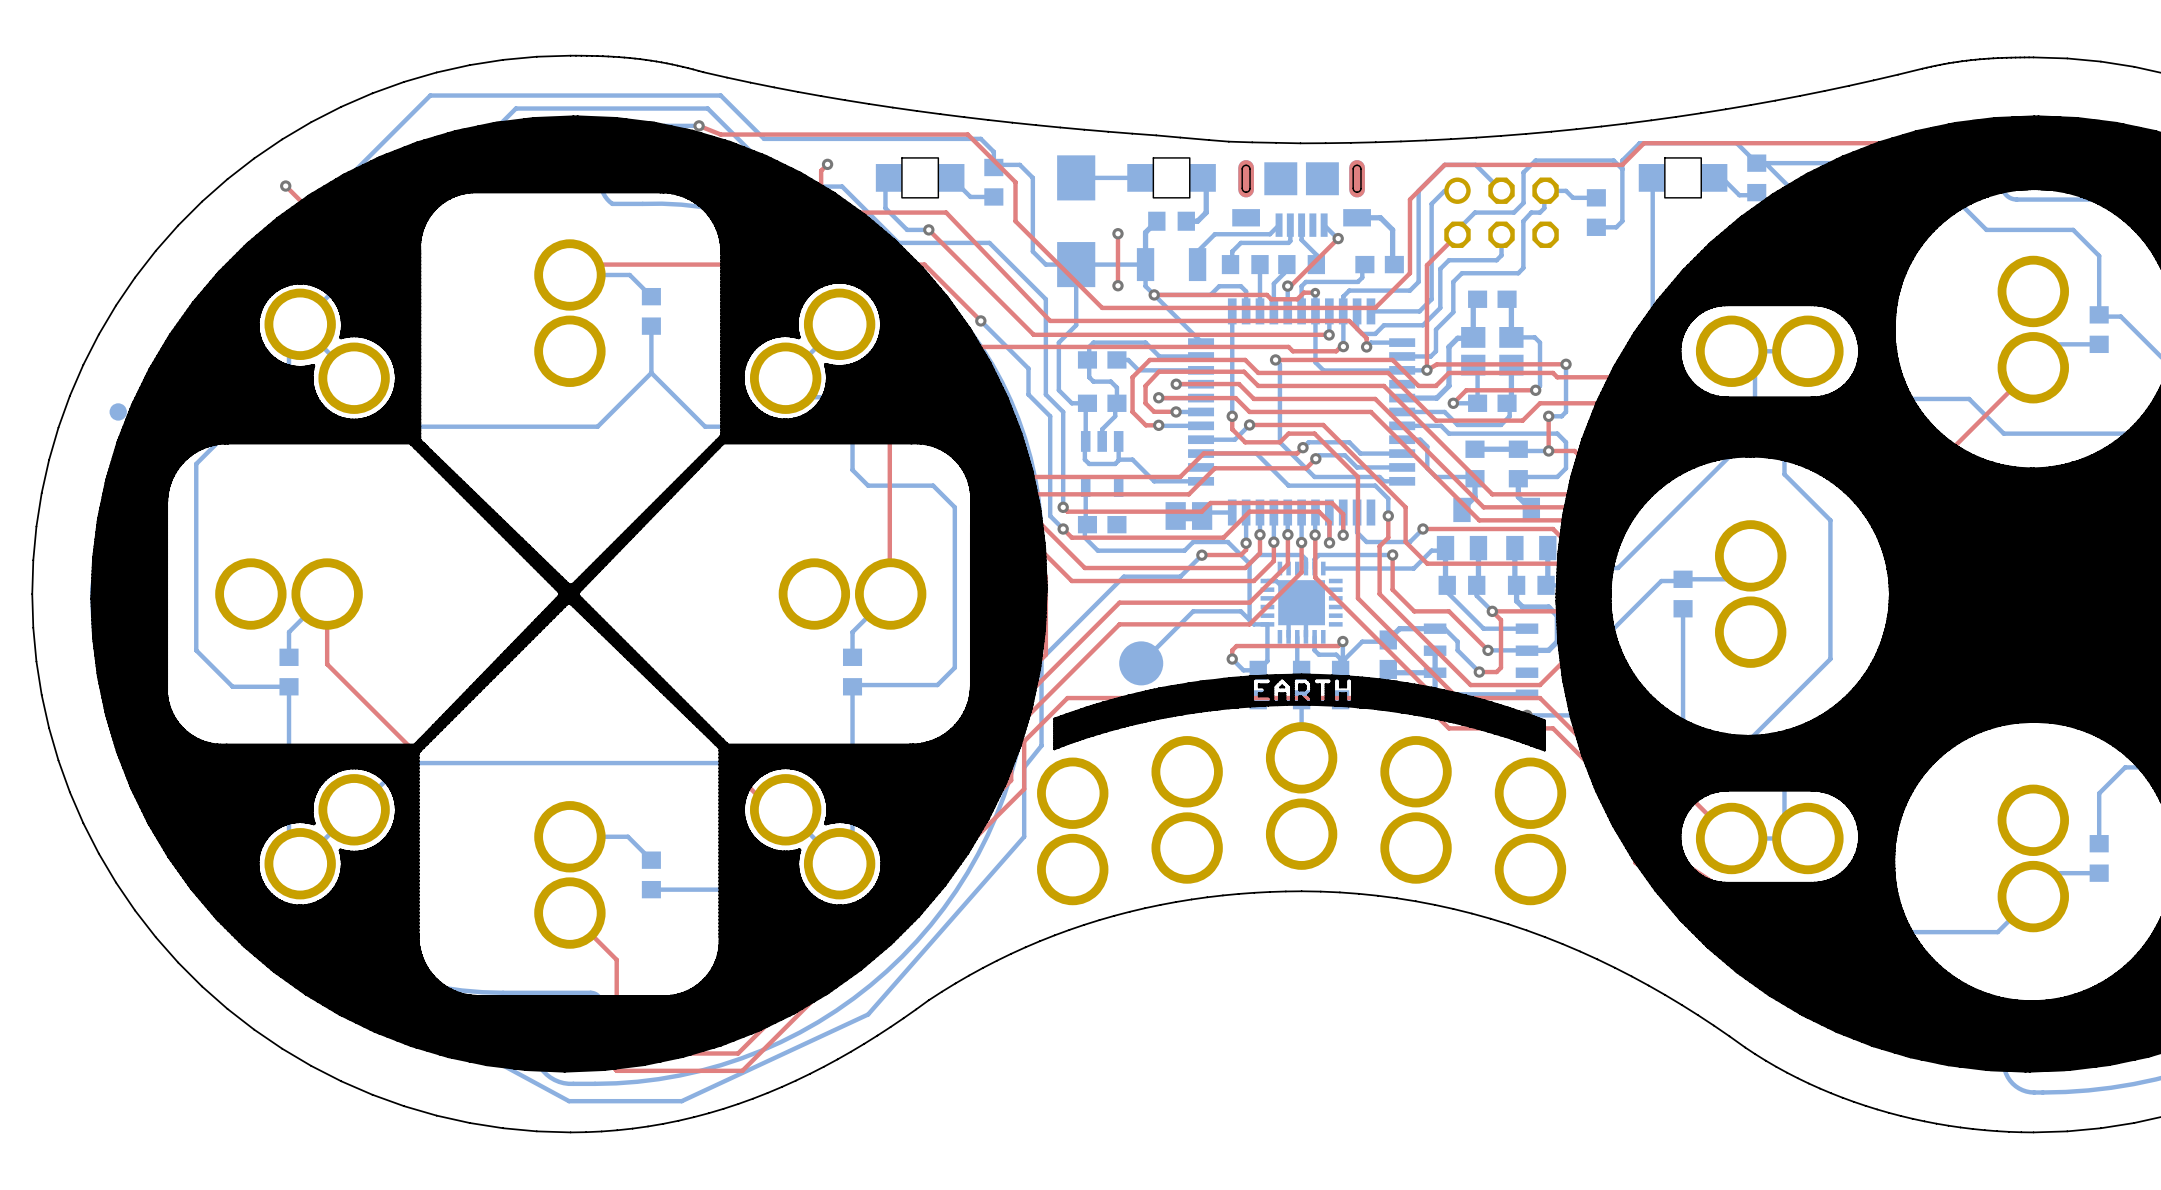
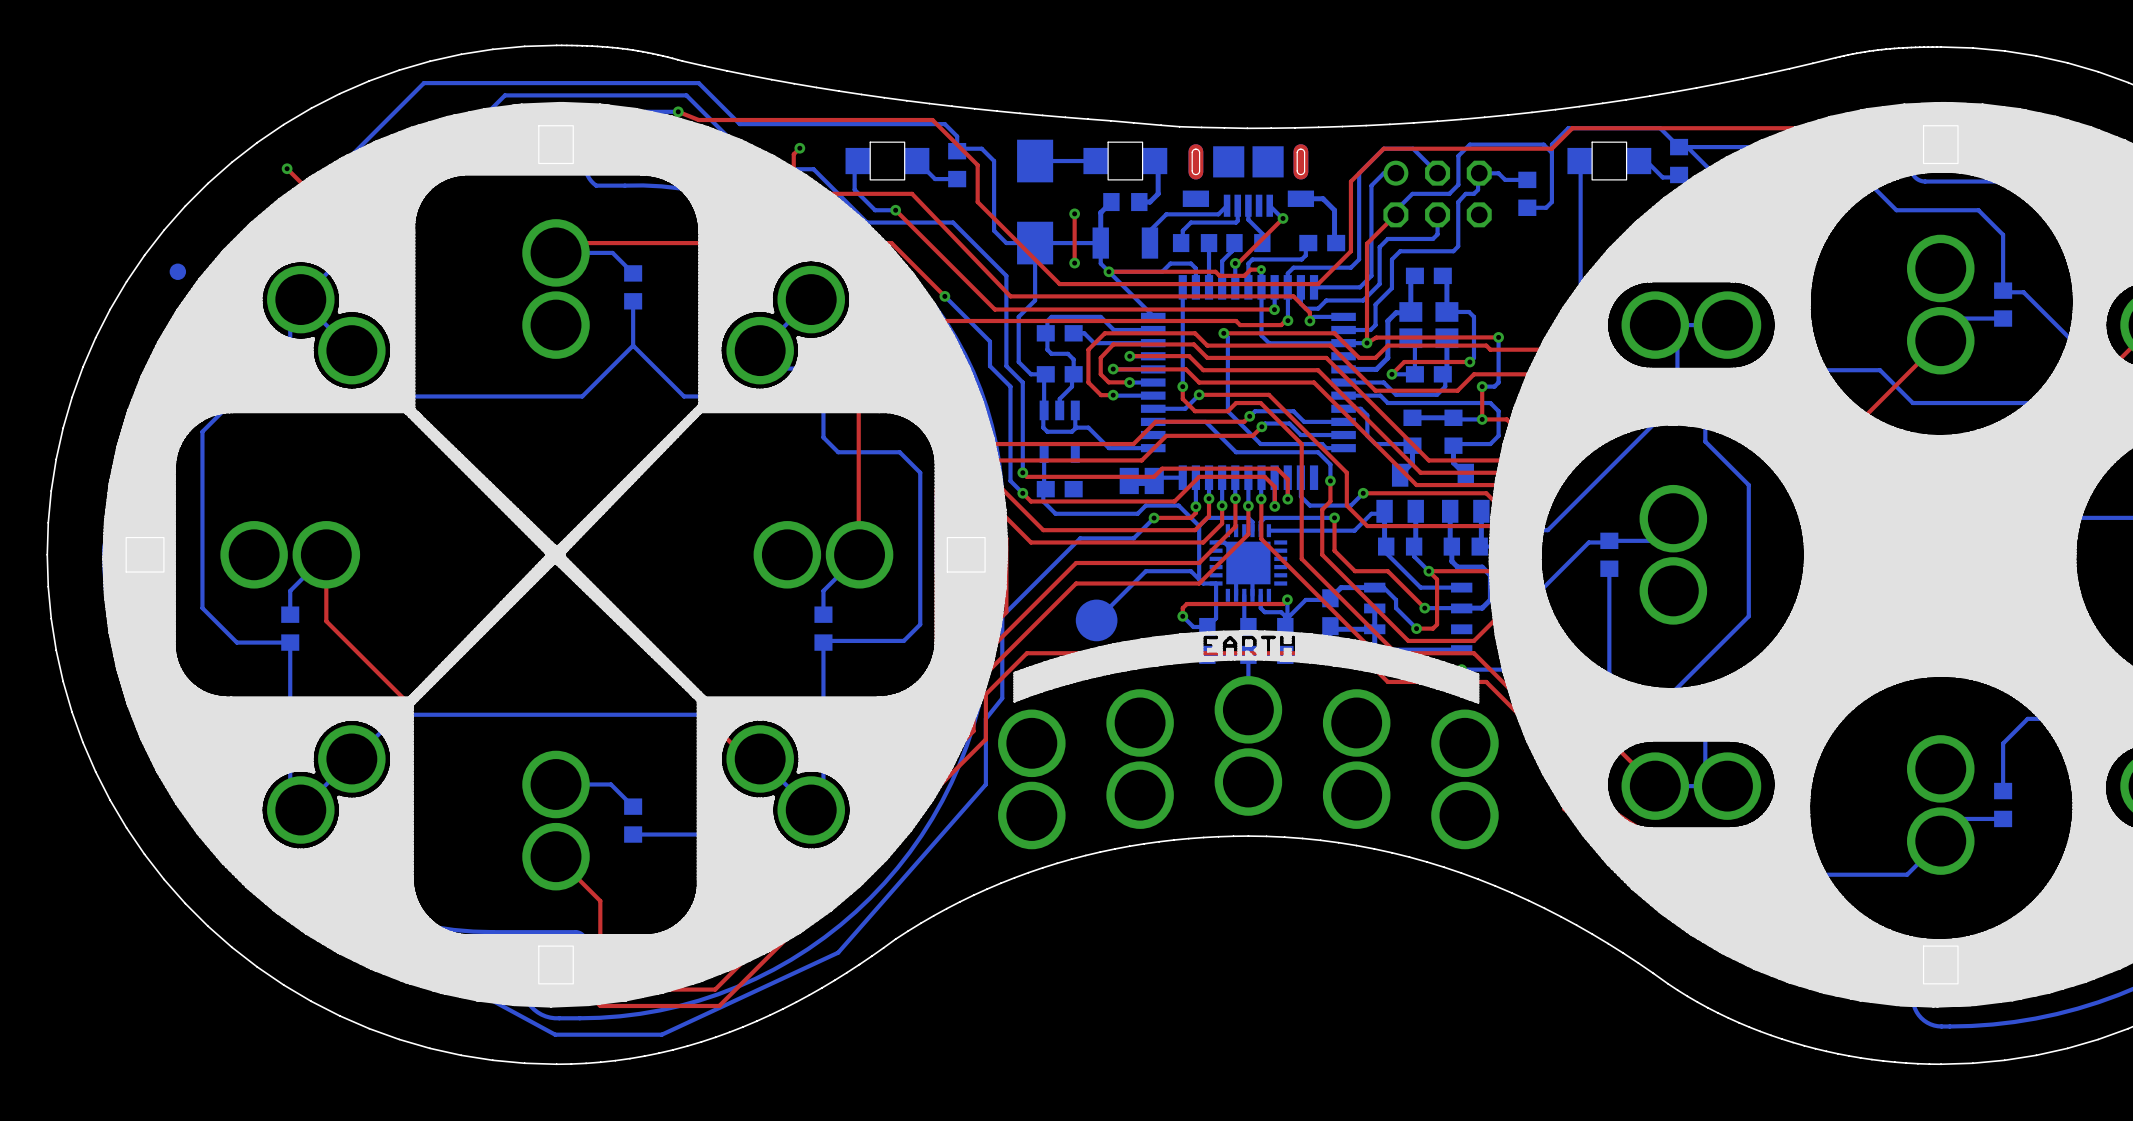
part position: (118, 411) -> (177, 271)

